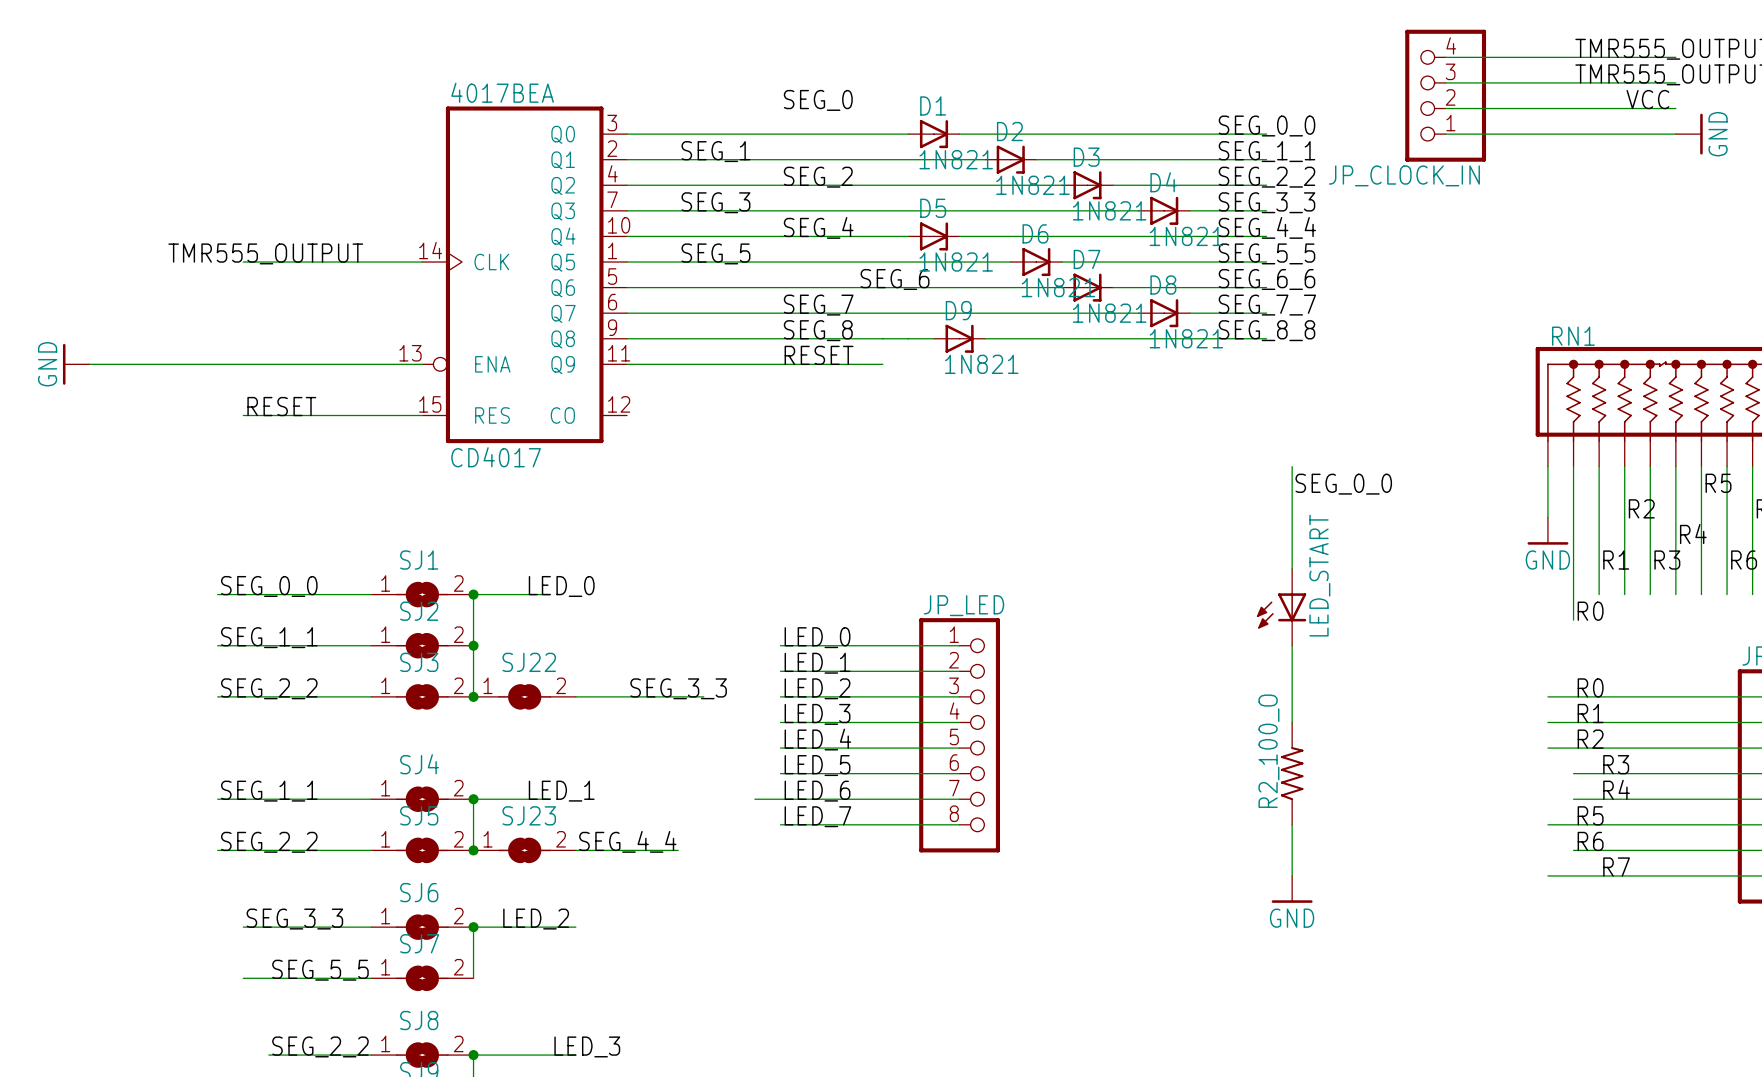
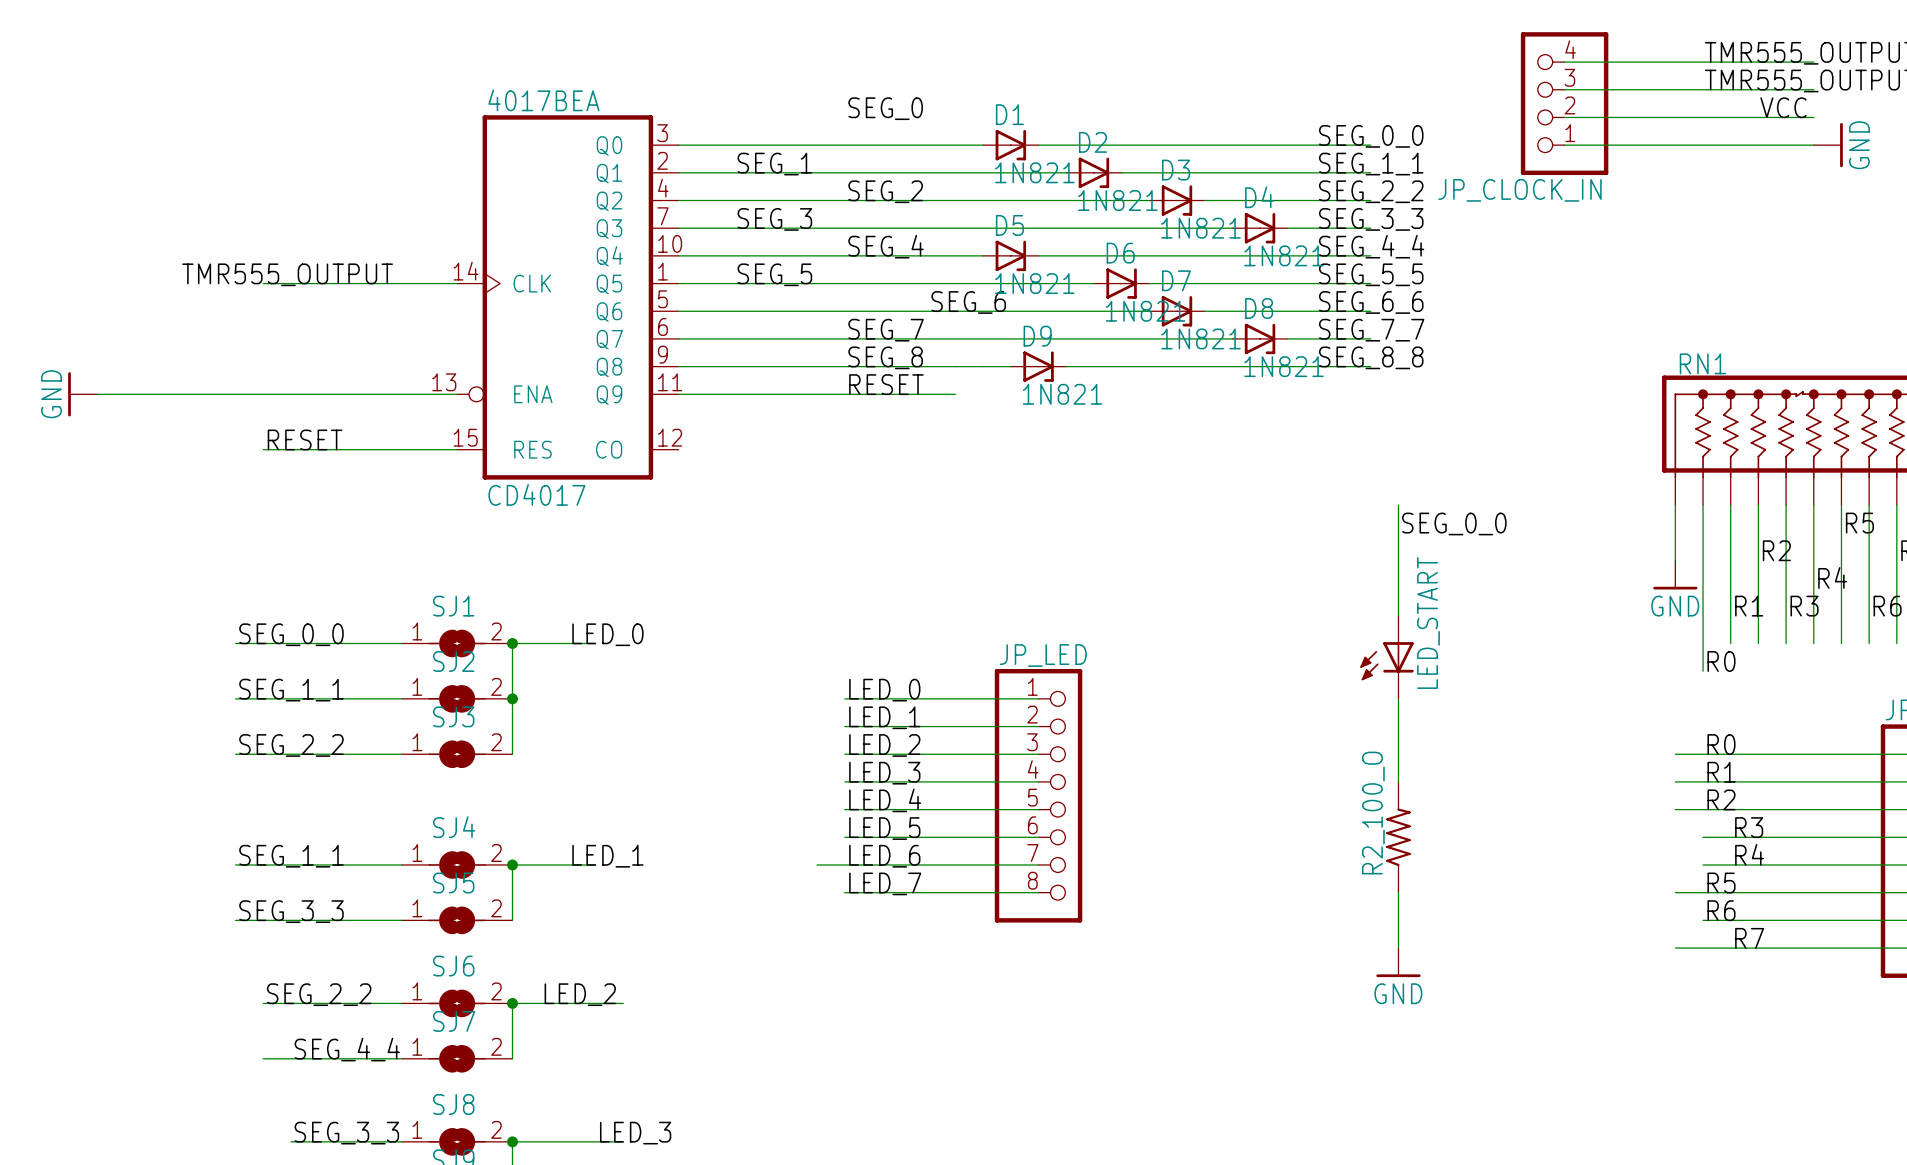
label: SEG_3_3 (678, 688) -> none
junction: (473, 696) -> none
SJ22: (524, 696) -> none
wire: (575, 696) (703, 696) -> none
label: SEG_4_4 (627, 841) -> none
label: SEG_2_2 (269, 842) -> SEG_3_3 (291, 911)
junction: (473, 850) -> none
SJ23: (524, 850) -> none
wire: (575, 850) (678, 850) -> none
label: SEG_3_3 (294, 919) -> SEG_2_2 (319, 994)
label: SEG_5_5 (320, 970) -> SEG_4_4 (347, 1049)
label: SEG_2_2 (320, 1046) -> SEG_3_3 (346, 1133)

